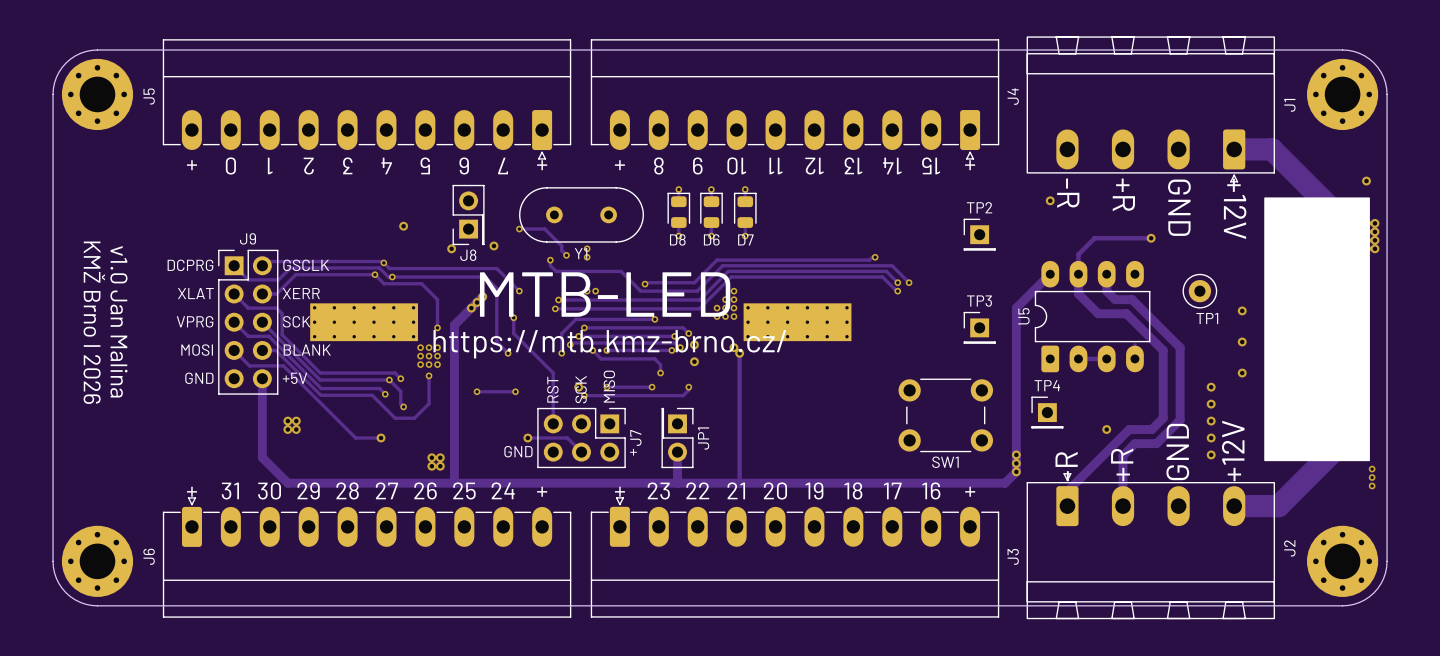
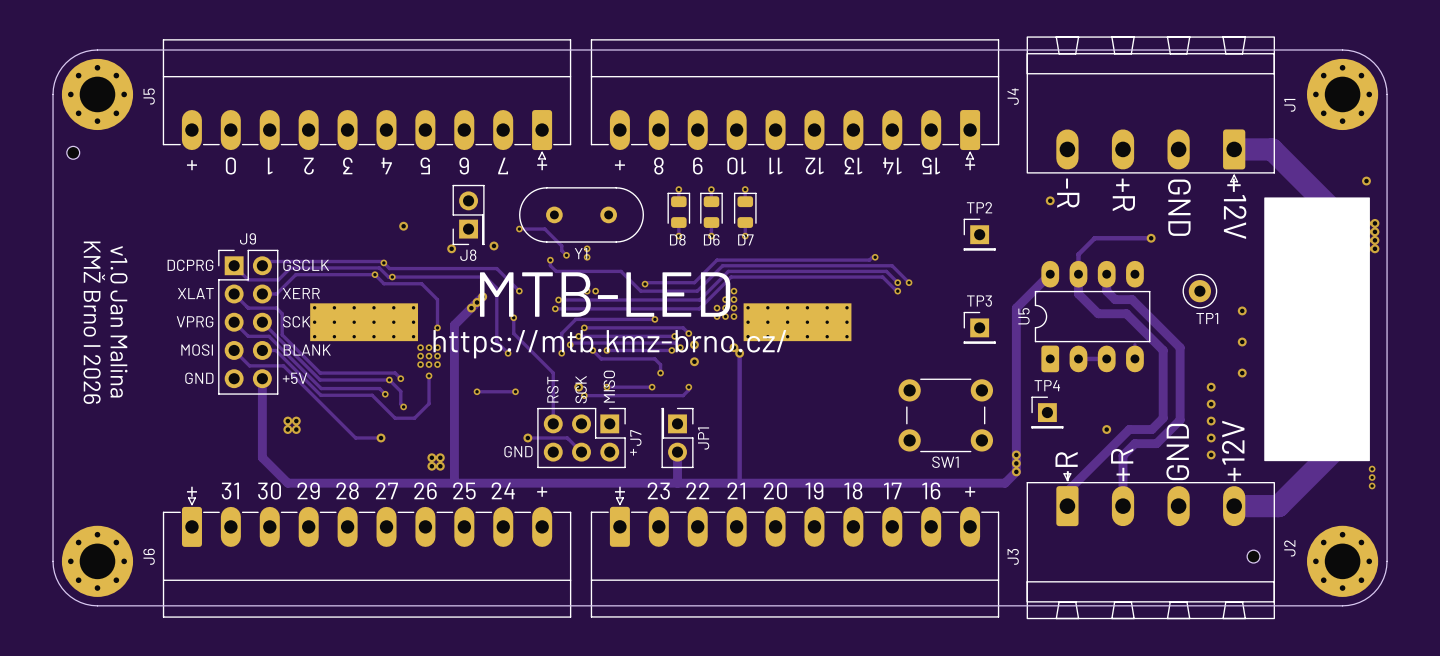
part: none -> (73, 152)
part: none -> (1253, 556)

